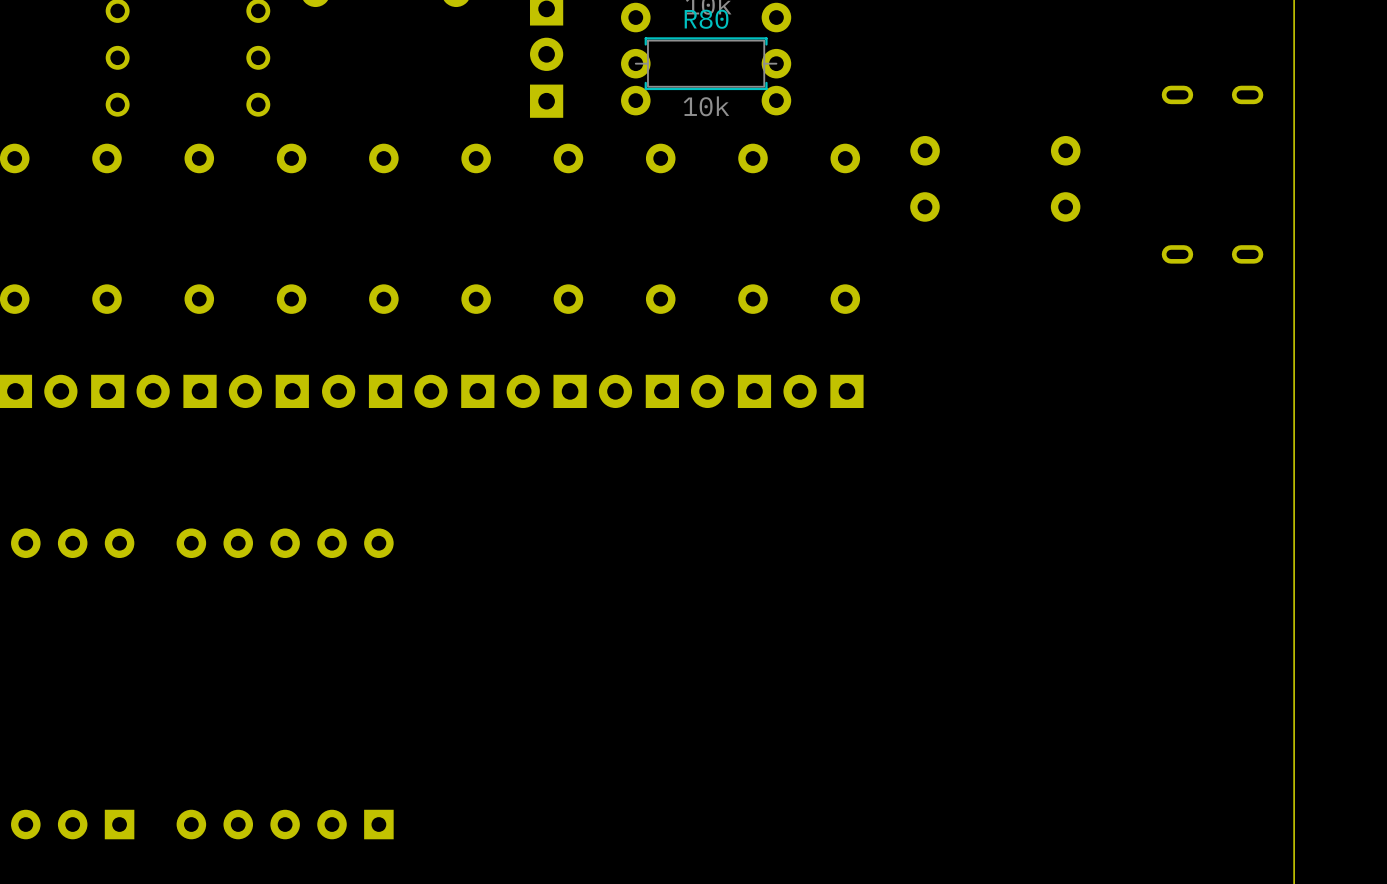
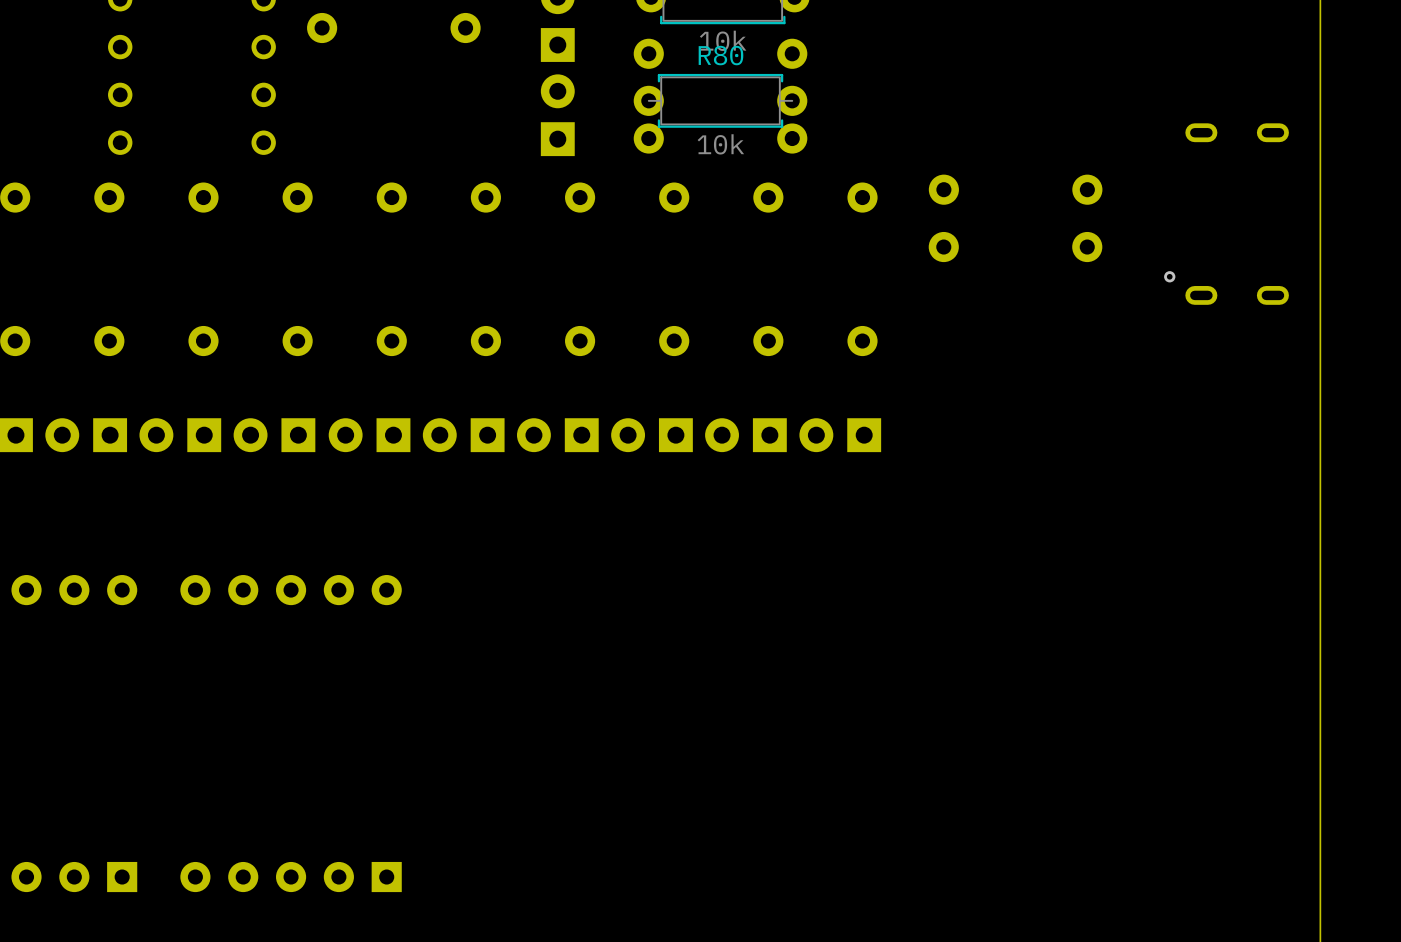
via: none -> (1169, 276)

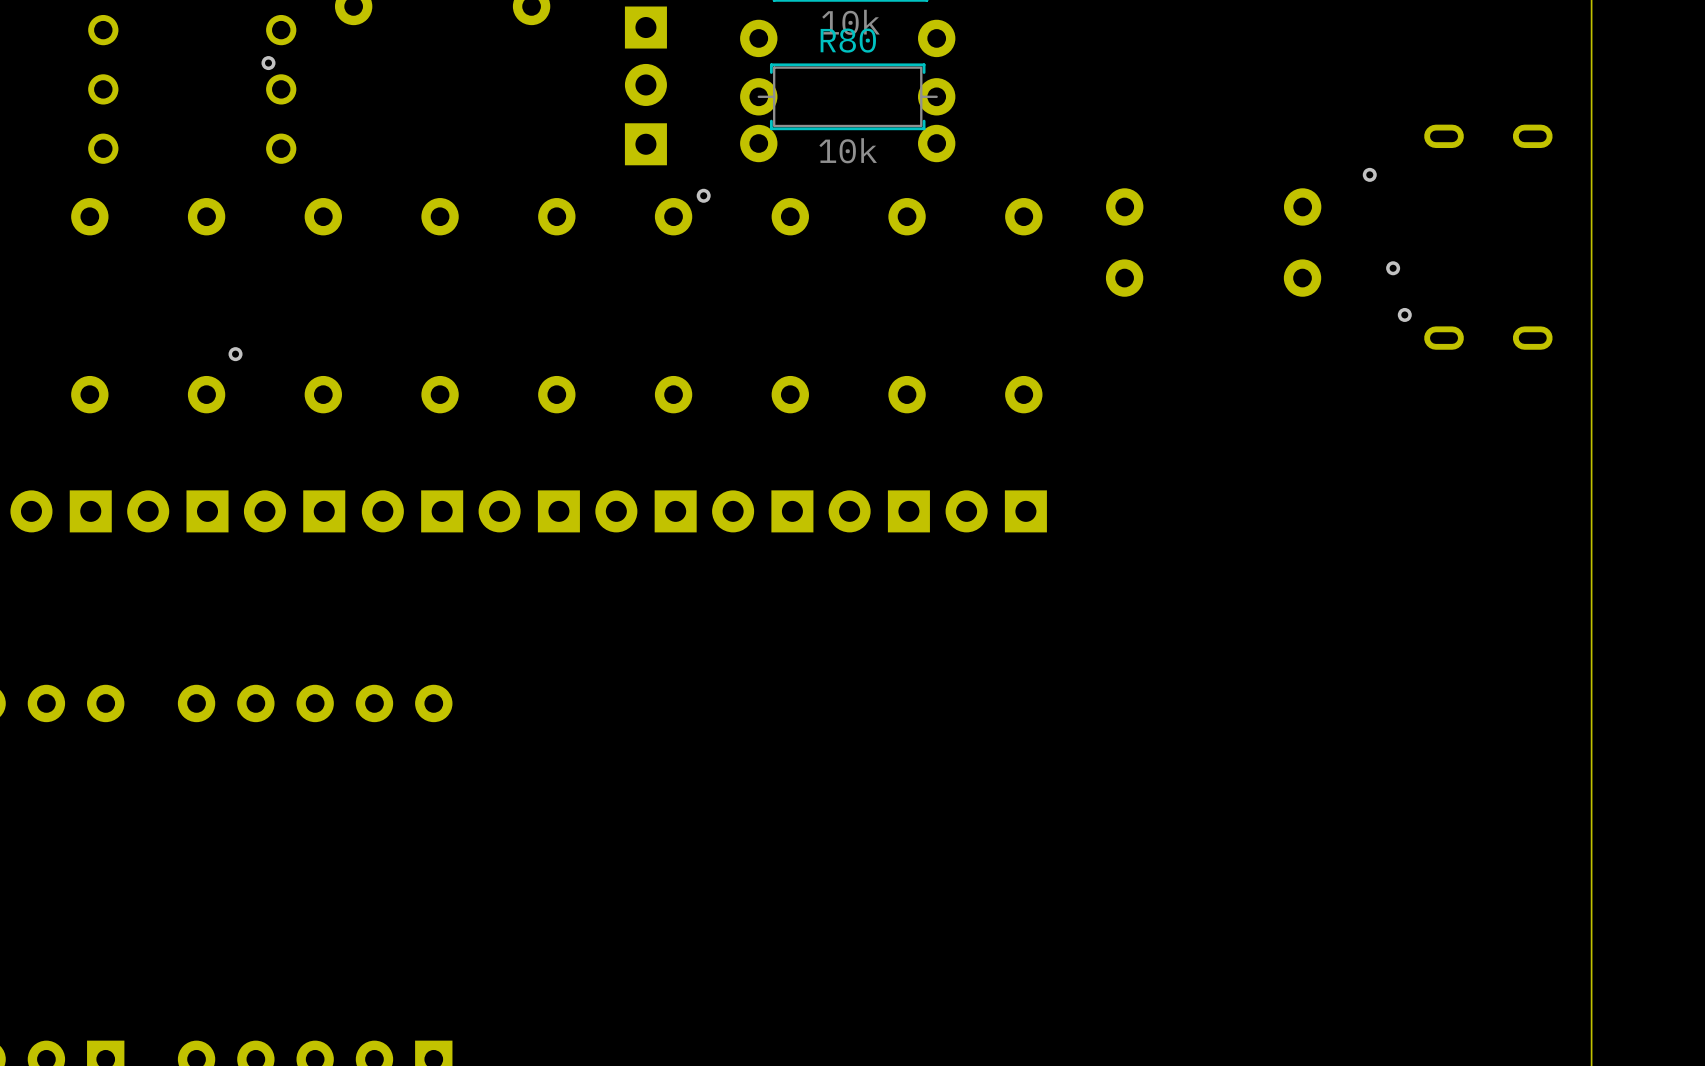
via: none -> (268, 63)
via: none -> (1369, 174)
via: none -> (703, 195)
via: none -> (1393, 268)
via: none -> (235, 354)

